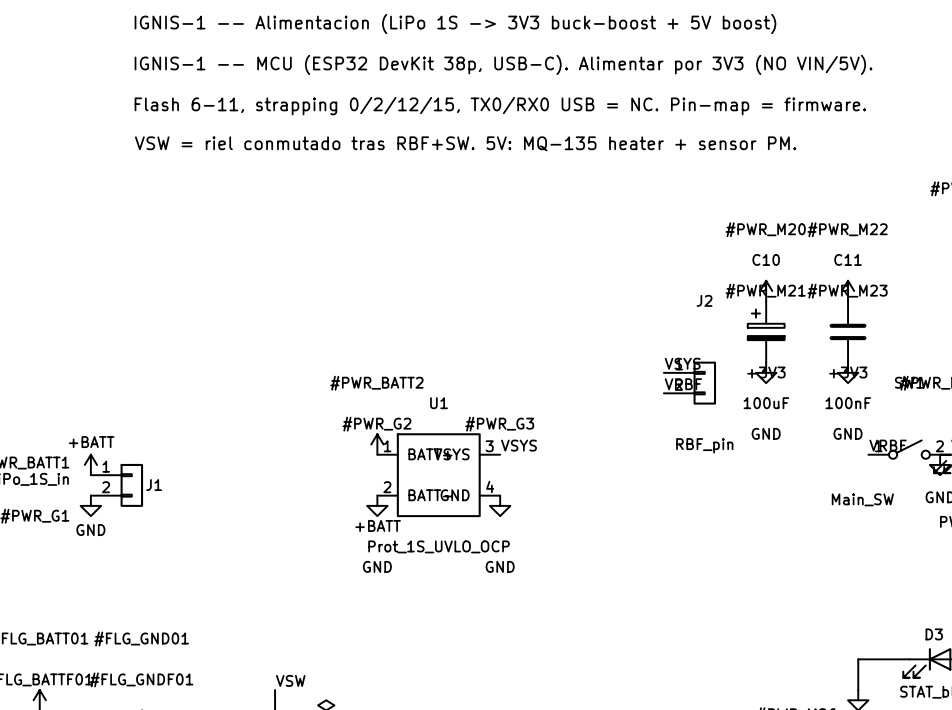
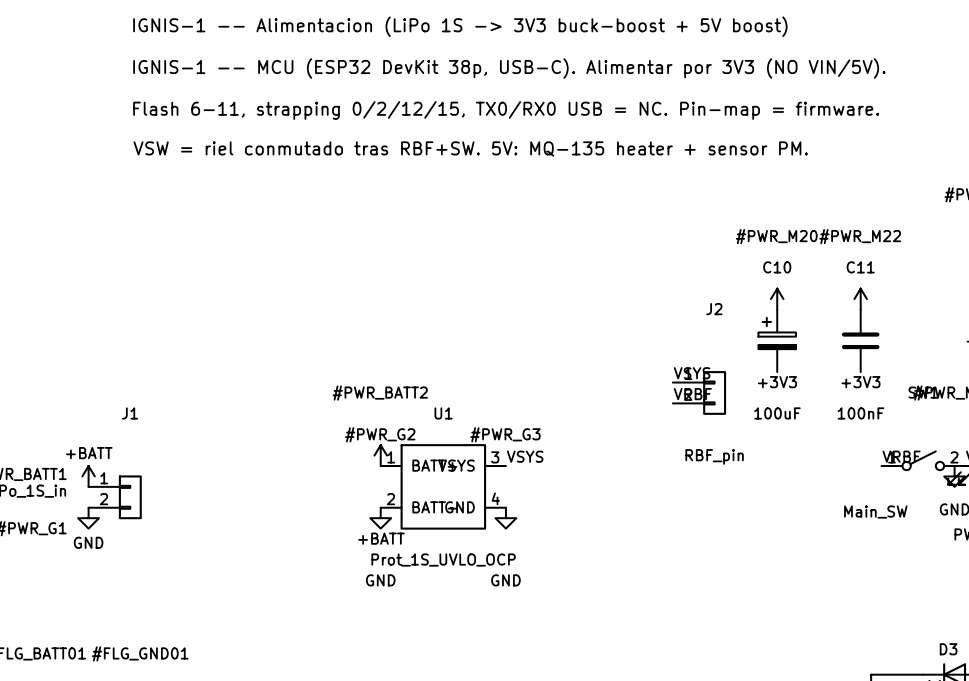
#PWR_M21: GND (766, 372) -> none
#PWR_M23: GND (848, 372) -> none
J1 name position: J1 (154, 485) -> J1 (130, 413)

